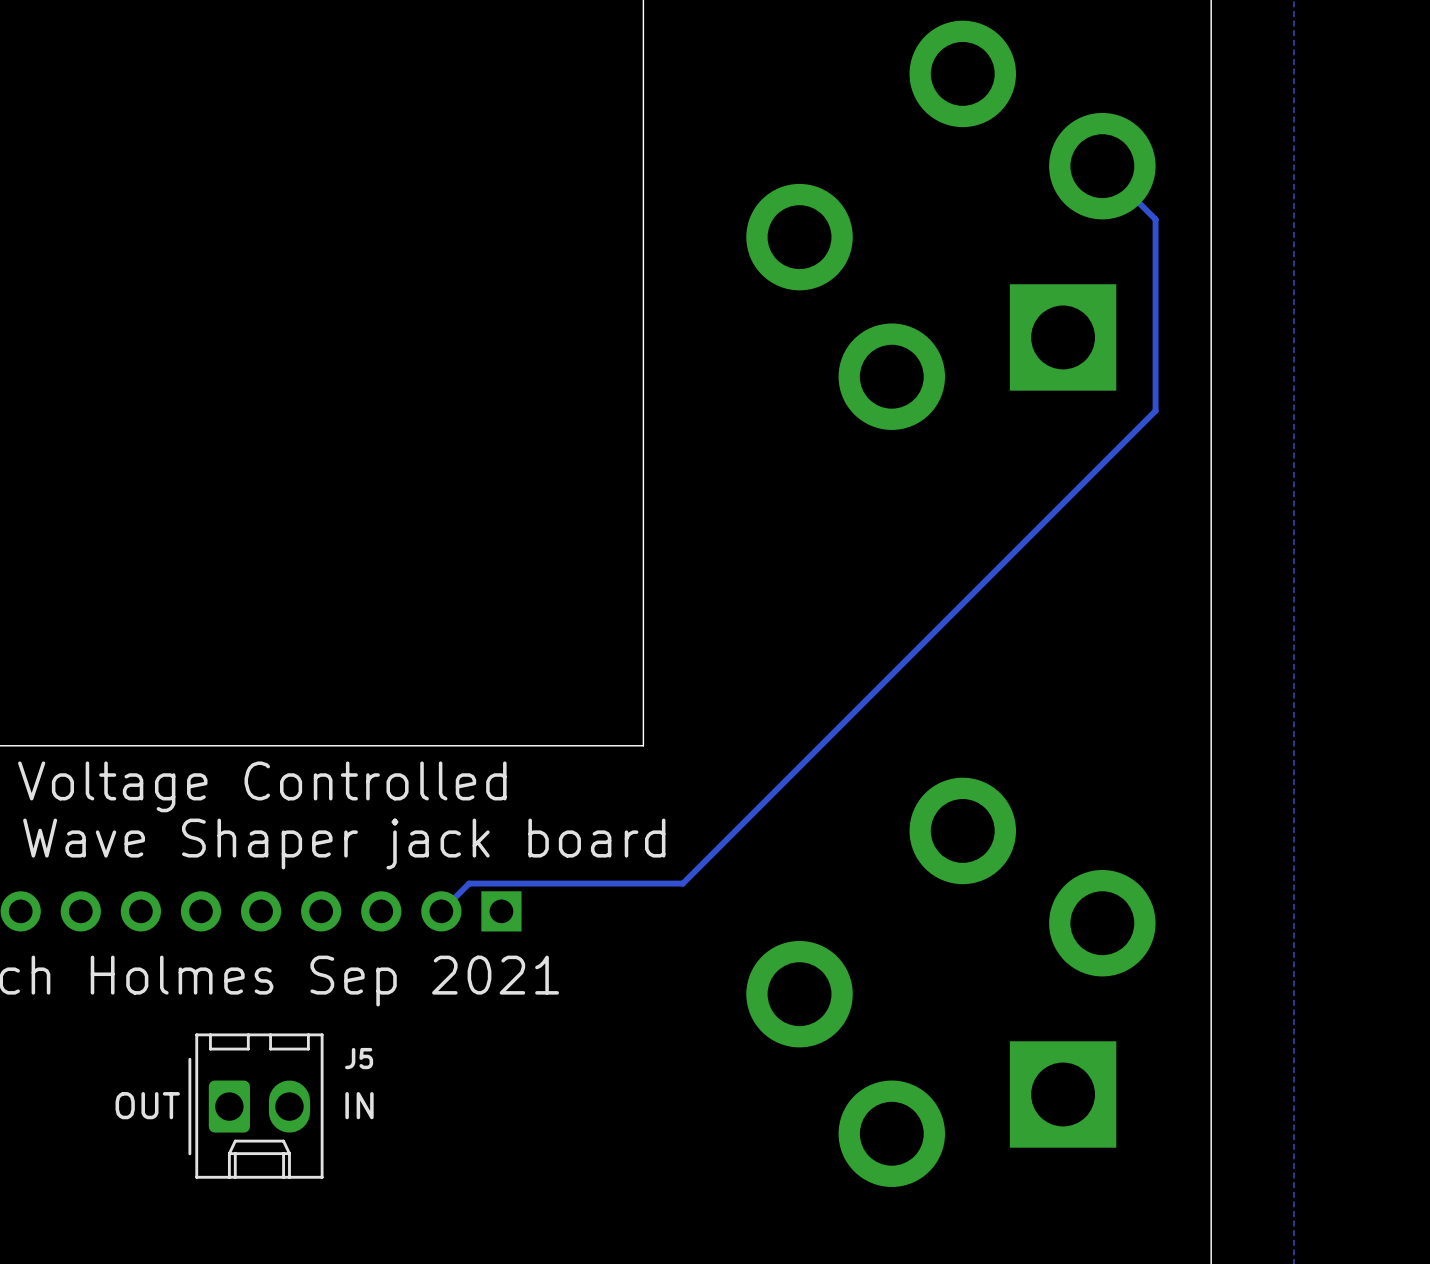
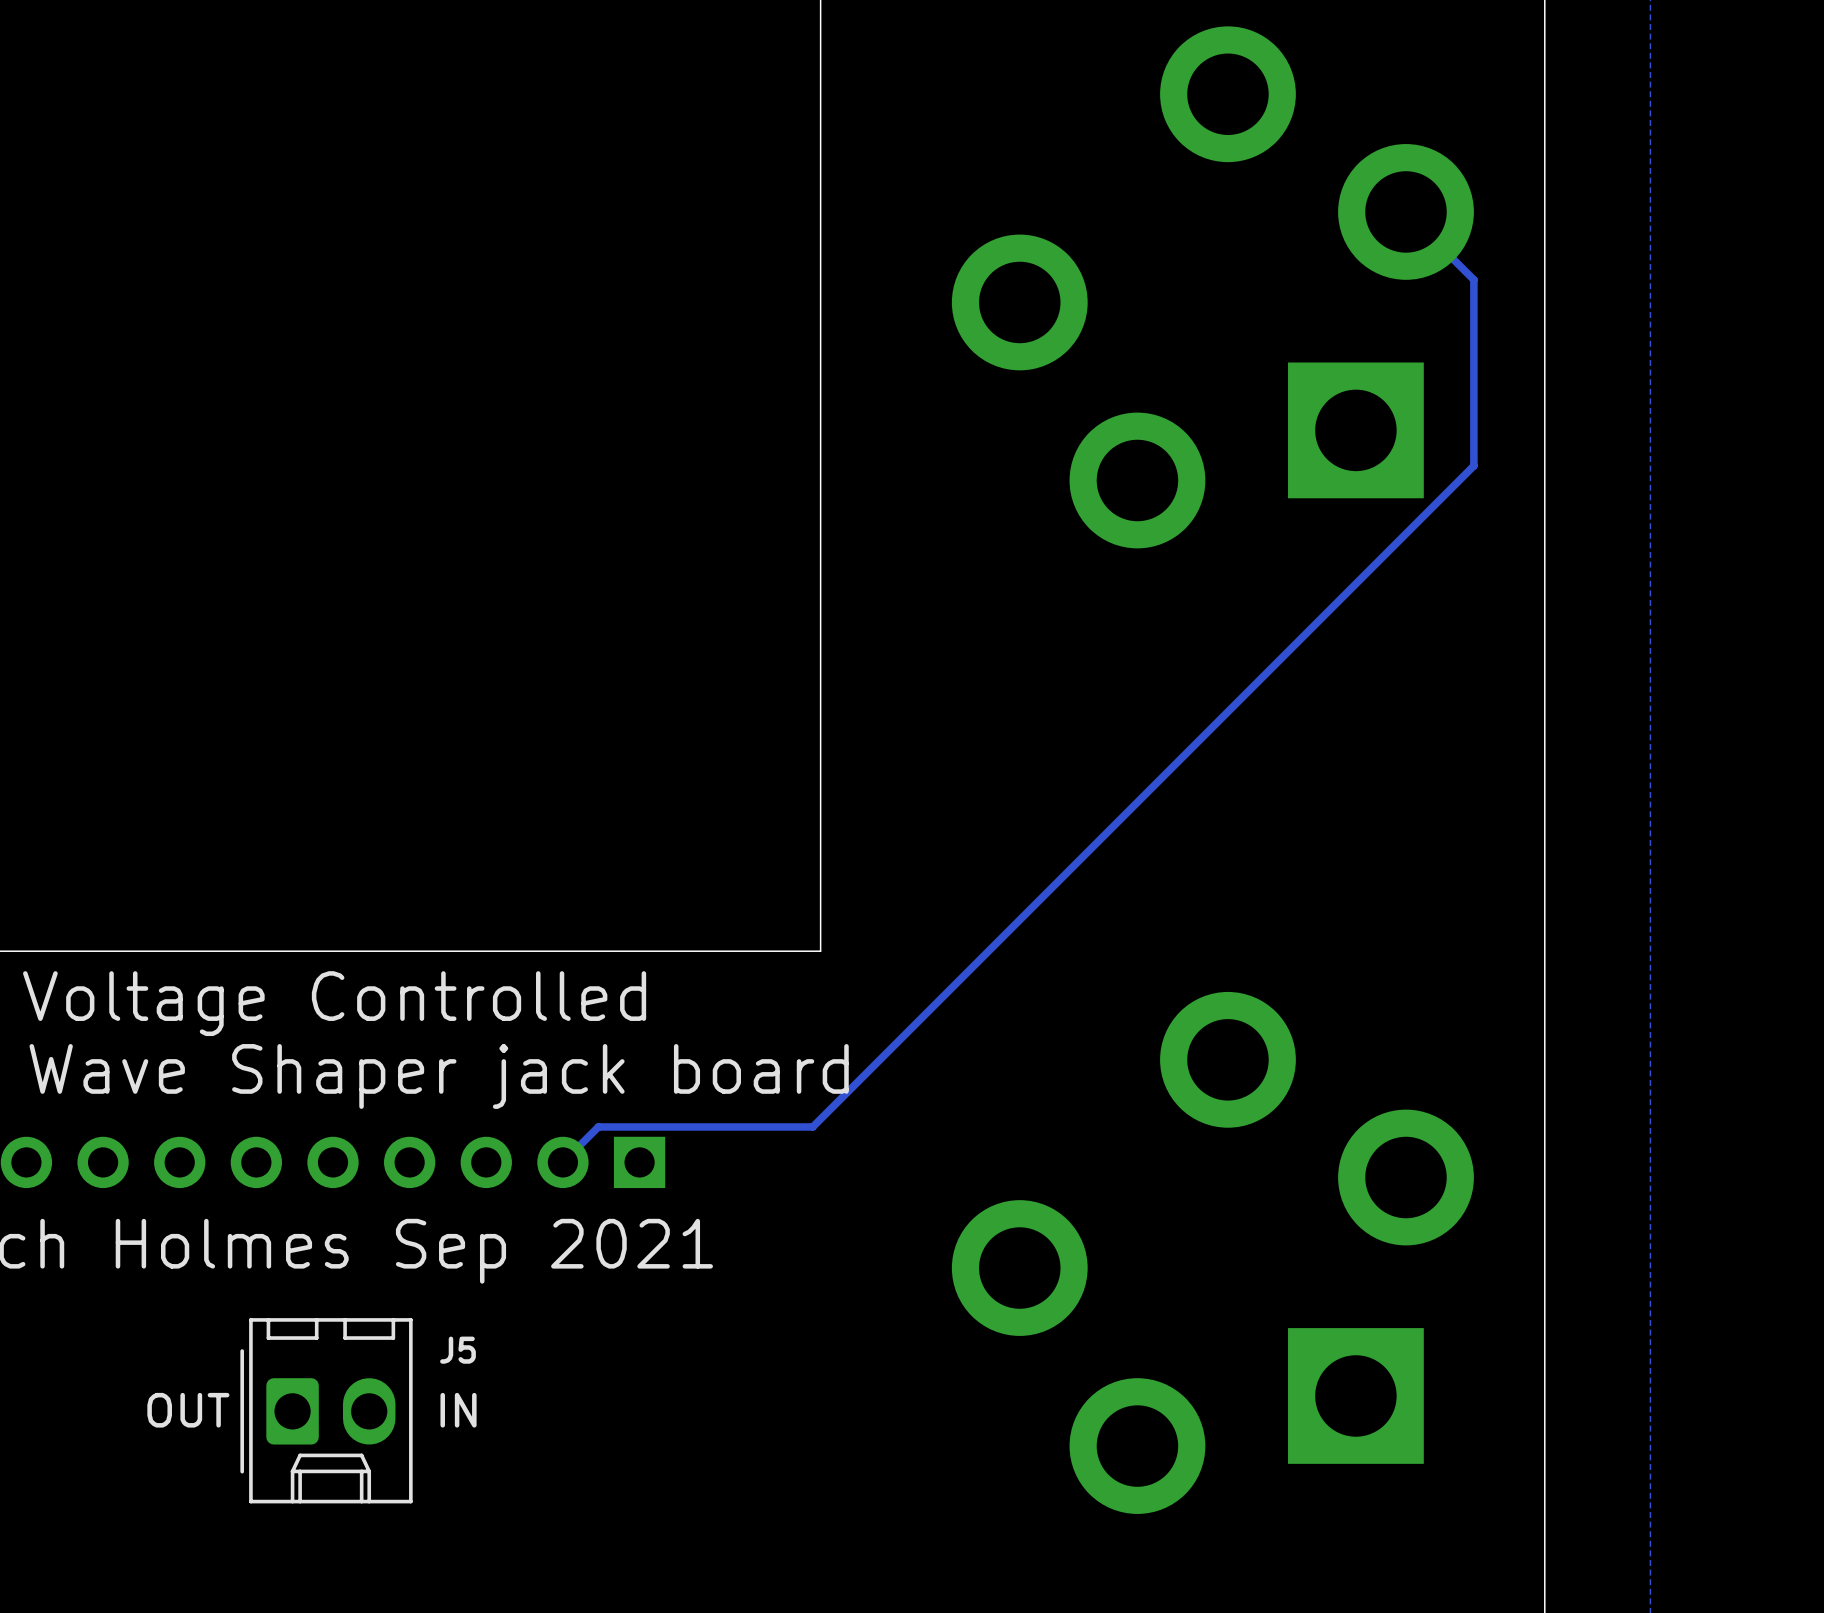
track: (1155, 365) (1155, 410) (682, 883) (637, 883) -> (1473, 465) (812, 1126)

